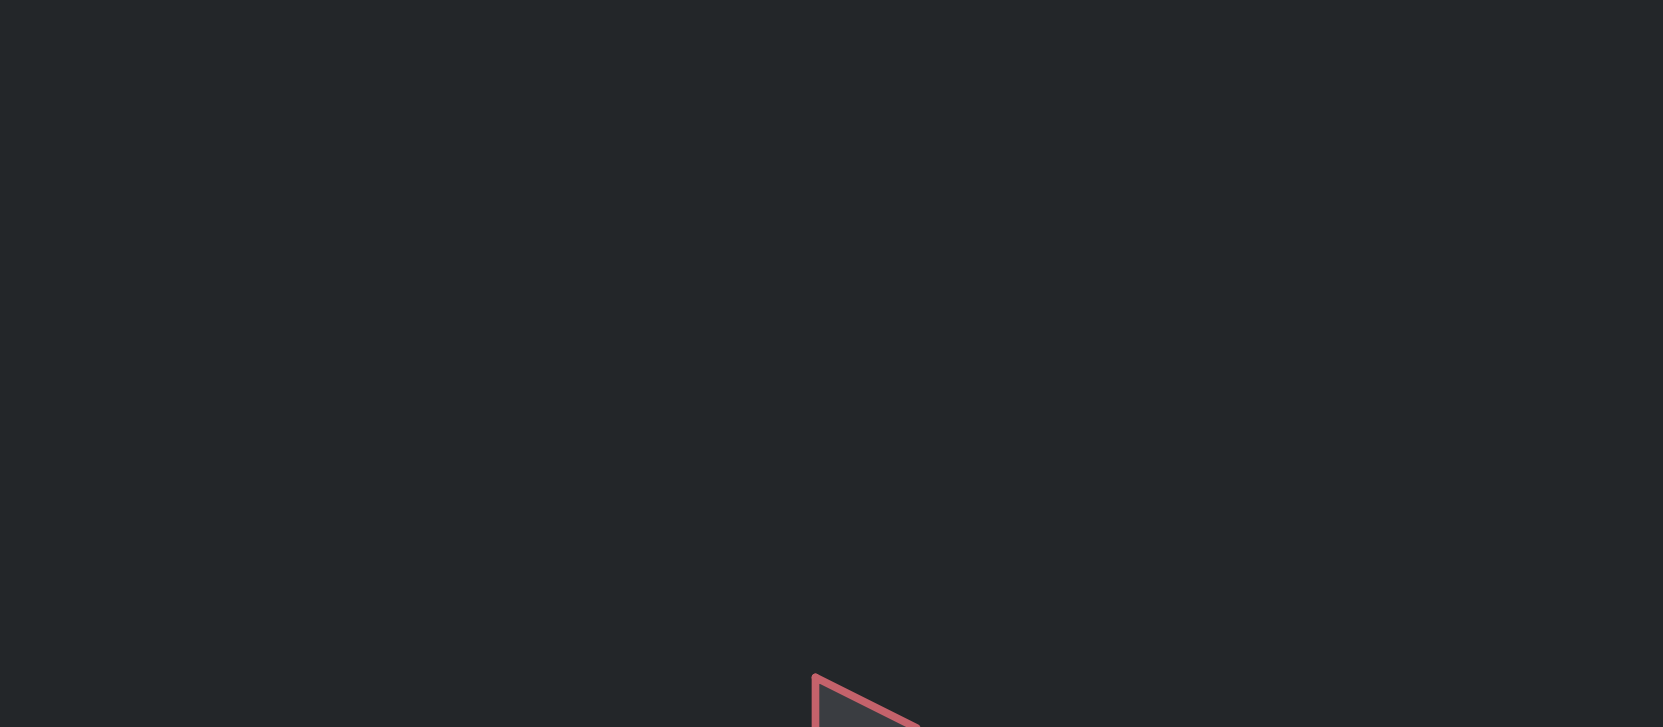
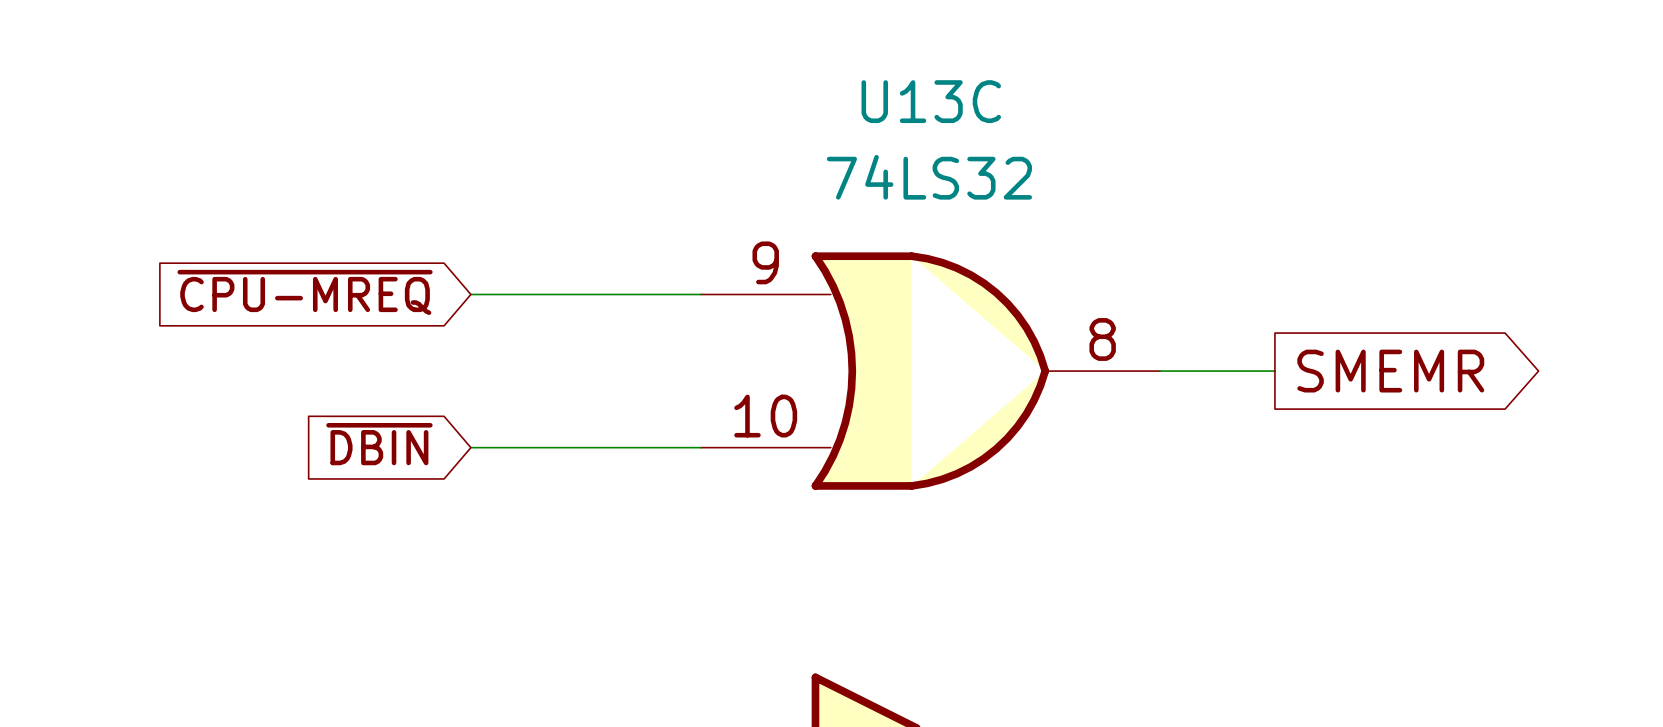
global label: none -> ~{CPU-MREQ} (305, 292)
wire: none -> (470, 294) (700, 294)
U13C: none -> 74LS32 (930, 371)
wire: none -> (1160, 371) (1274, 371)
global label: none -> SMEMR (1390, 371)
global label: none -> ~{DBIN} (379, 444)
wire: none -> (470, 447) (700, 447)

